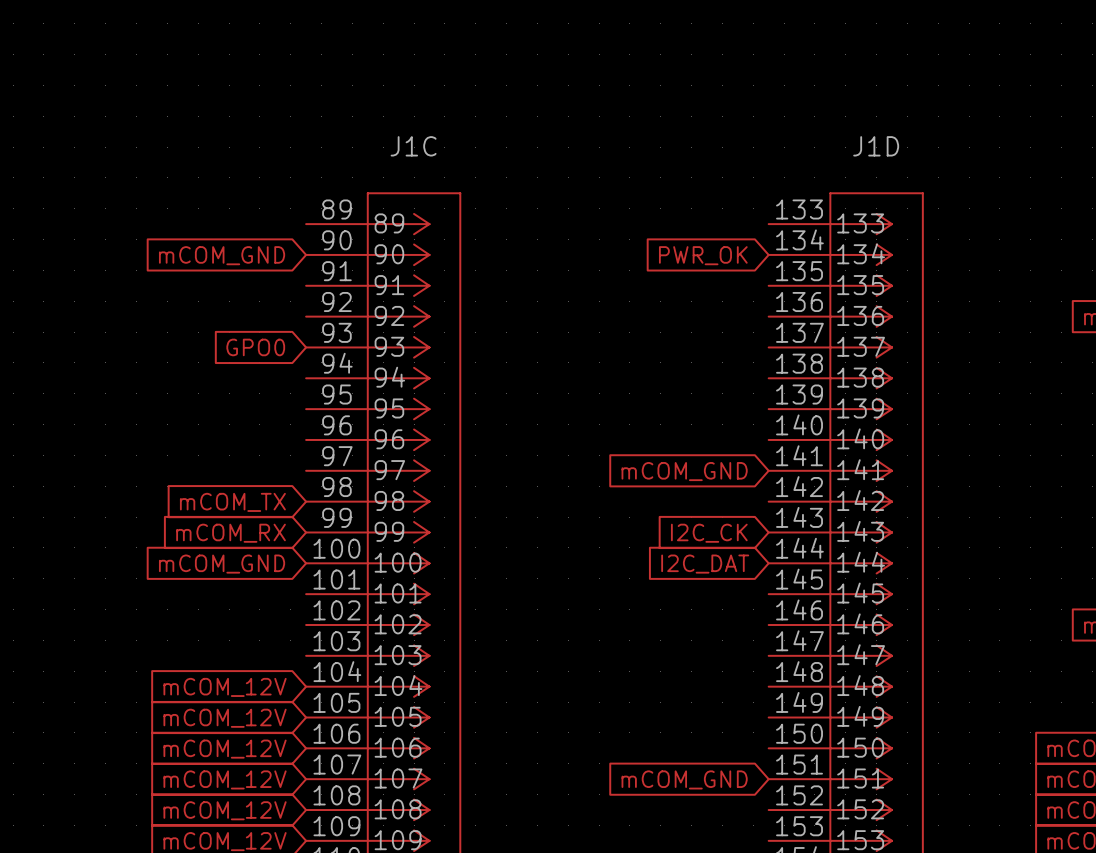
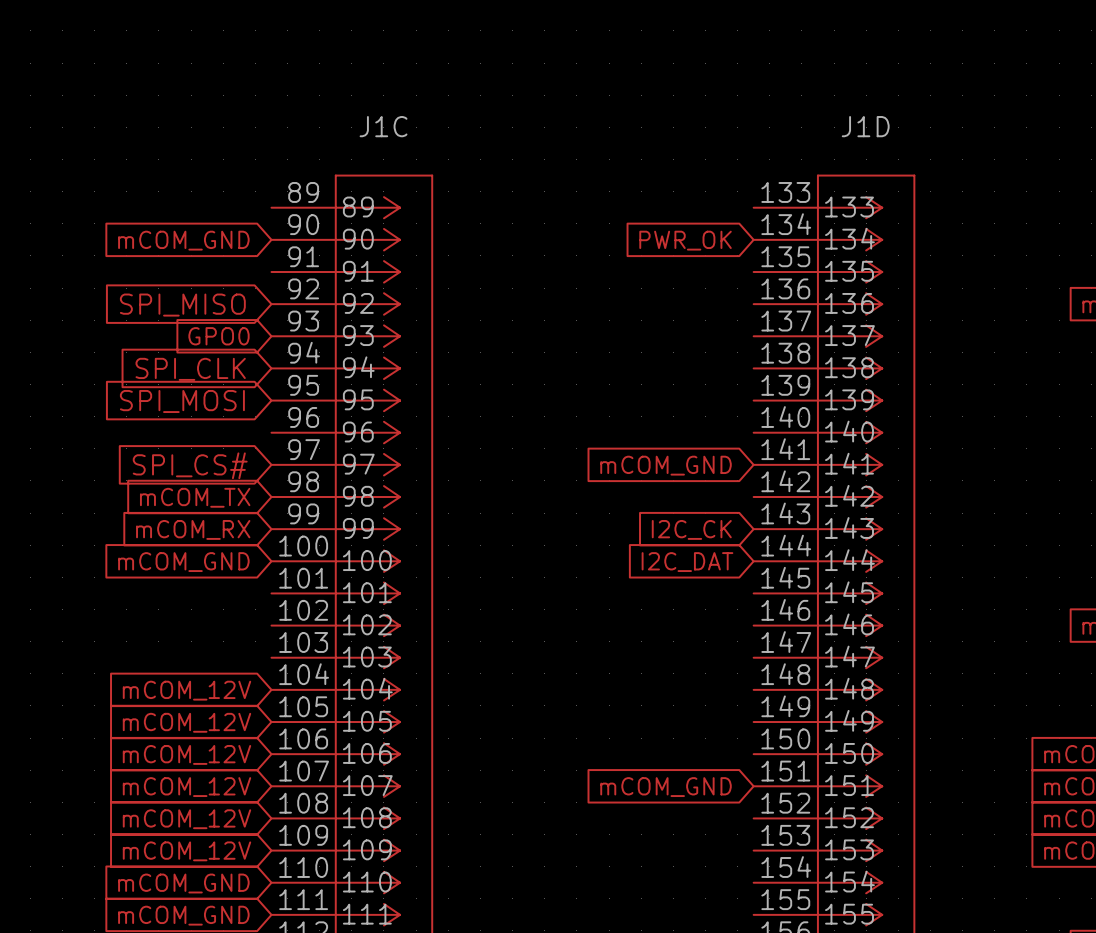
global label: none -> SPI_MISO (182, 305)
global label: none -> SPI_CLK (190, 369)
global label: none -> SPI_MOSI (182, 401)
global label: none -> SPI_CS# (190, 465)

